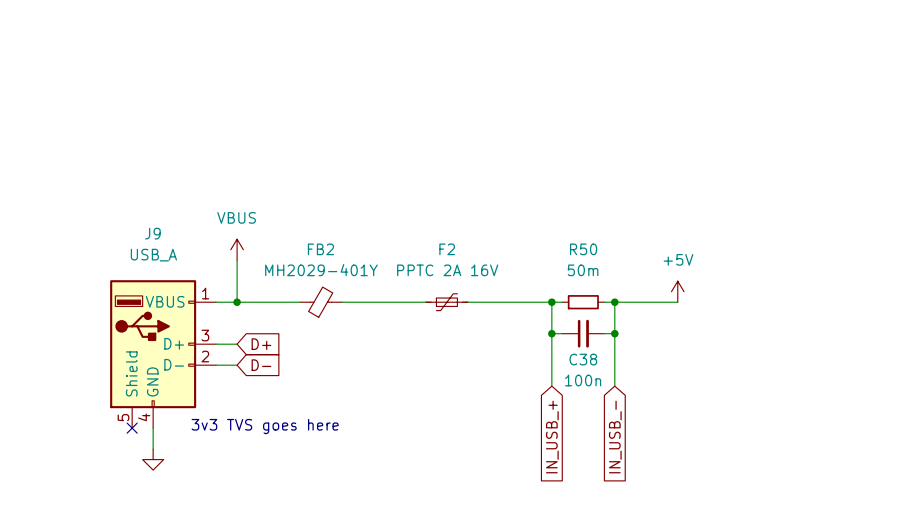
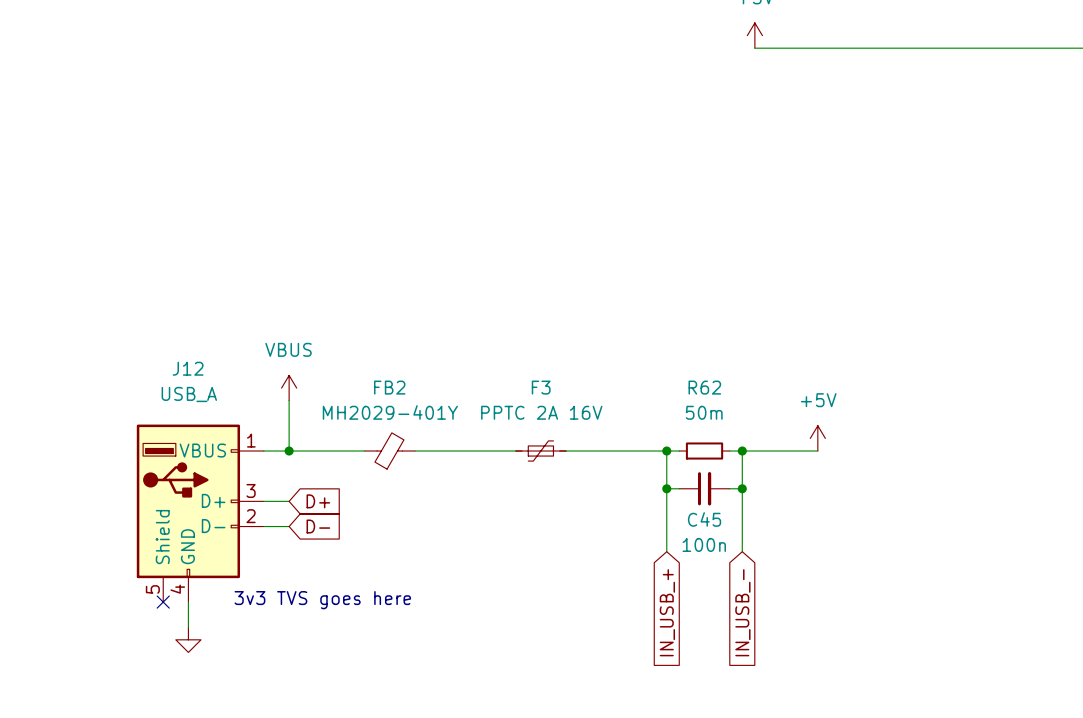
J9 name: J9 (152, 233) -> J12 (188, 368)
F2 name: F2 (447, 249) -> F3 (541, 387)
R50 name: R50 (583, 249) -> R62 (704, 387)
C38 name: C38 (583, 359) -> C45 (704, 519)

